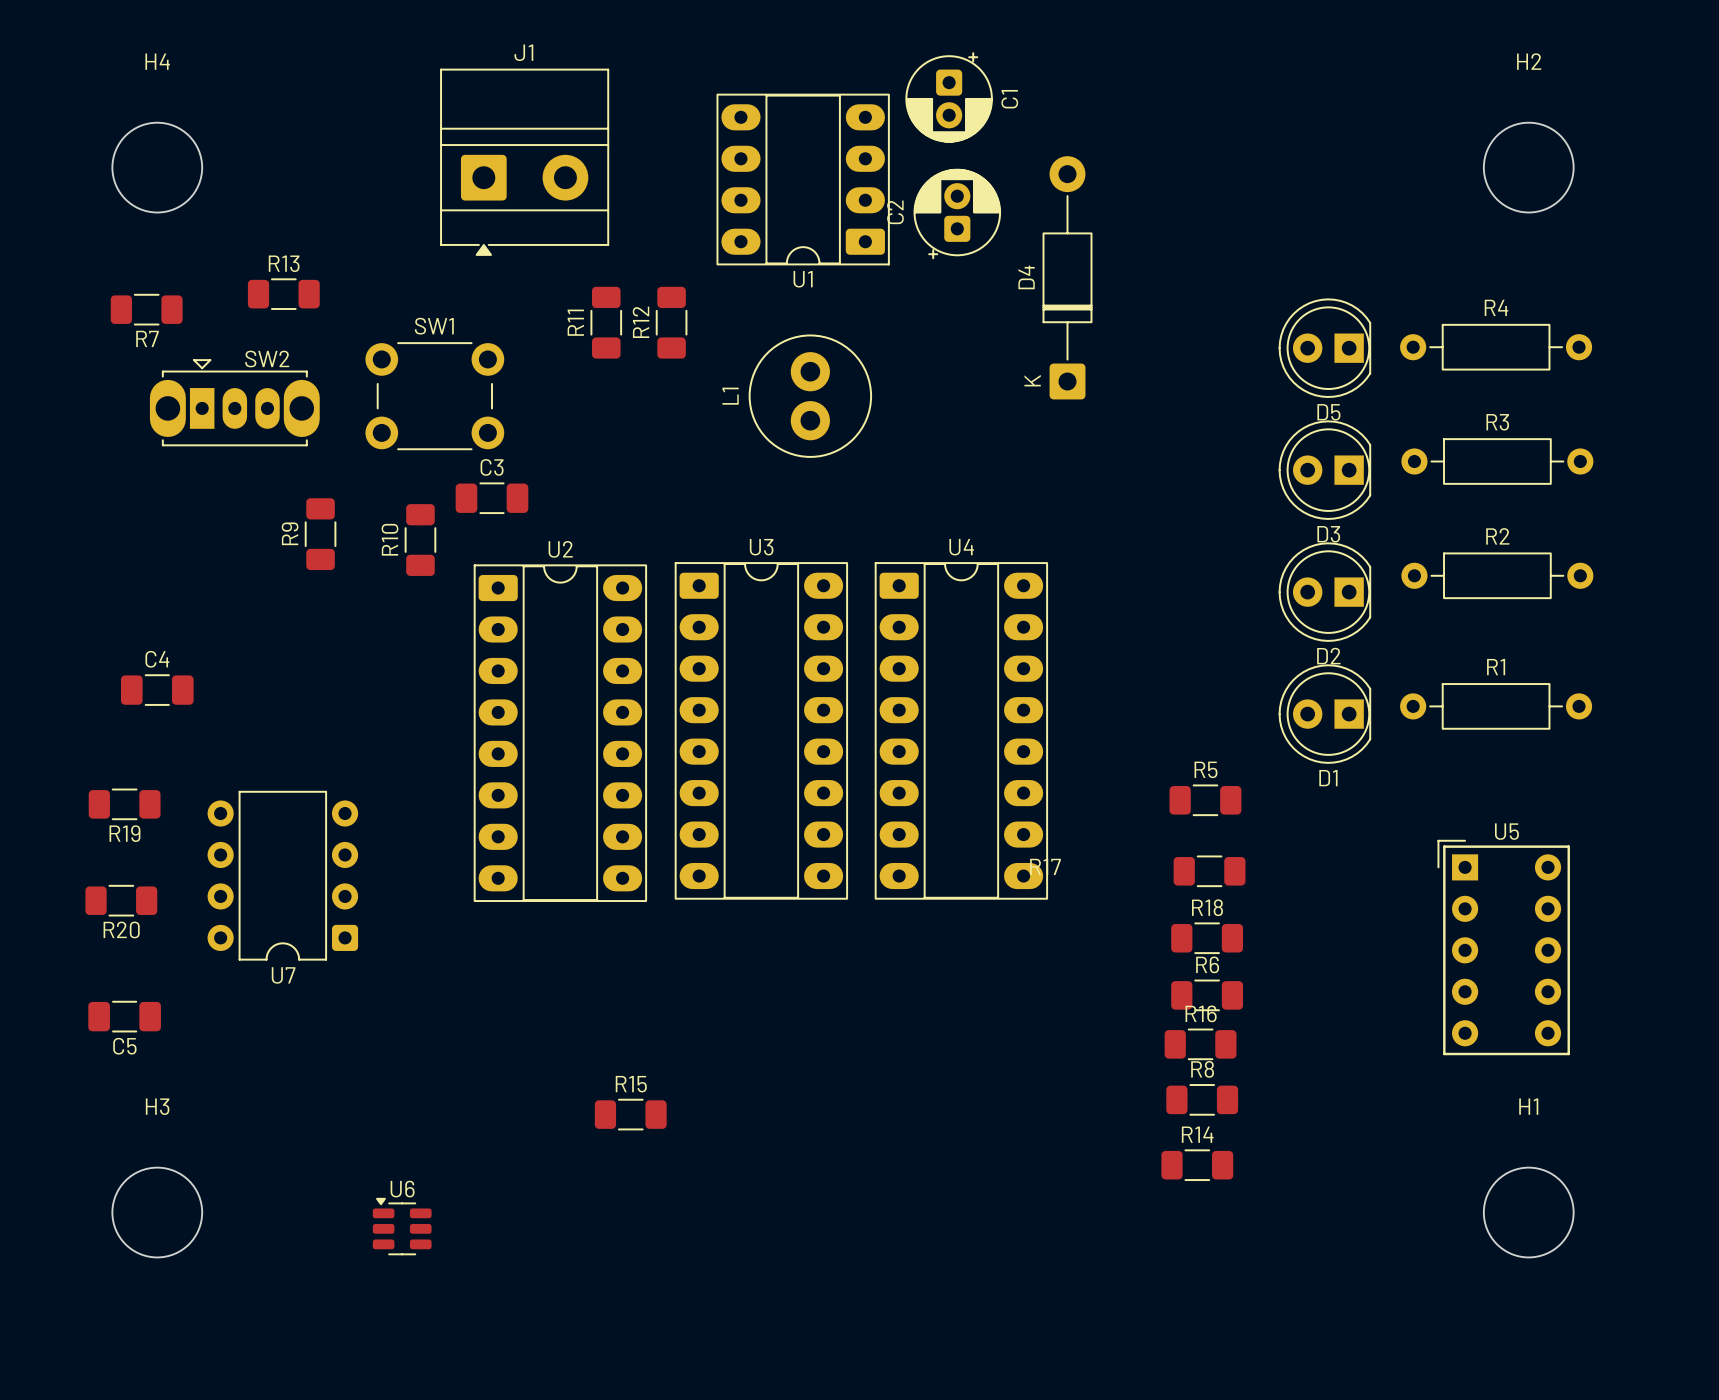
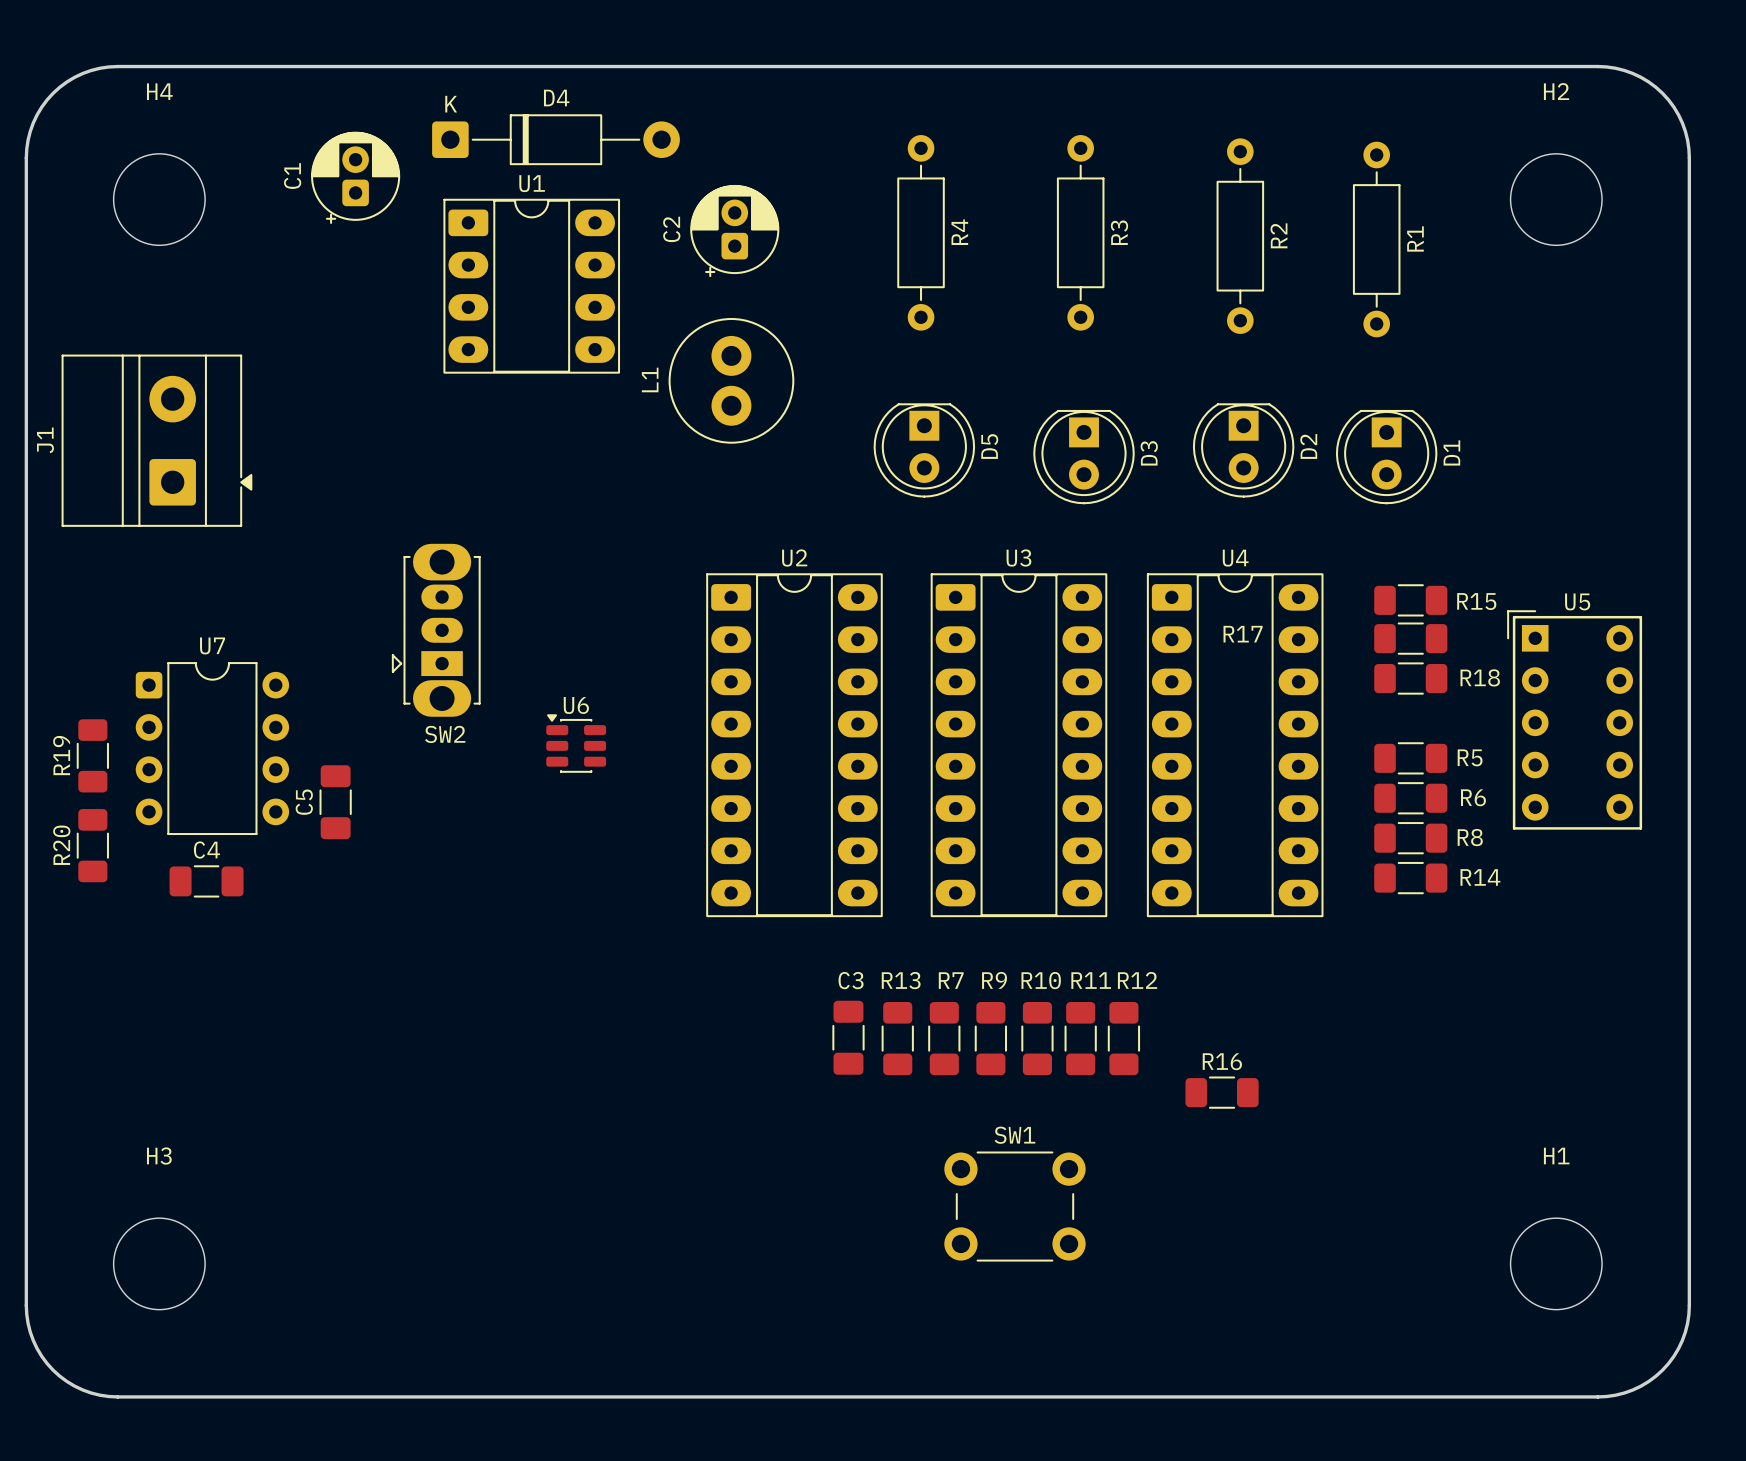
board edge: none -> (117, 66) (1597, 66) (1624, 70) (1640, 77) (1655, 87) (1673, 107) (1682, 123) (1687, 140) (1689, 158) (1689, 1305) (1687, 1323) (1682, 1340) (1668, 1363) (1655, 1376) (1640, 1386) (1615, 1395) (1597, 1396) (117, 1396) (99, 1395) (82, 1389) (59, 1376) (47, 1363) (37, 1348) (30, 1332) (26, 1305) (26, 158) (28, 140) (33, 123) (41, 107) (53, 93) (66, 81) (82, 73) (99, 68) (117, 66)
C1 rotation: 0° (949, 97) -> 180° (355, 177)
C1 position: (949, 97) -> (355, 177)
J1 rotation: 0° (524, 162) -> 90° counterclockwise (156, 440)
J1 position: (524, 162) -> (156, 440)
U1 rotation: 0° (803, 179) -> 180° (531, 286)
U1 position: (803, 179) -> (531, 286)
C2 position: (957, 214) -> (734, 231)
D4 rotation: 0° (1067, 277) -> 90° clockwise (555, 139)
D4 position: (1067, 277) -> (555, 139)
R13 rotation: 0° (283, 294) -> 90° clockwise (897, 1038)
R13 position: (283, 294) -> (897, 1038)
R7 rotation: 0° (146, 309) -> 90° clockwise (944, 1038)
R7 position: (146, 309) -> (944, 1038)
R11 name rotation: 0° (575, 322) -> 90° clockwise (1091, 980)
R11 name position: R11 (575, 322) -> R11 (1091, 980)
R11 position: (606, 322) -> (1080, 1038)
R12 name rotation: 0° (641, 322) -> 90° clockwise (1137, 980)
R12 name position: R12 (641, 322) -> R12 (1137, 980)
R12 position: (671, 322) -> (1123, 1038)
R7 name position: R7 (147, 338) -> R7 (951, 980)
R4 rotation: 0° (1496, 347) -> 90° clockwise (921, 232)
R4 position: (1496, 347) -> (921, 232)
D5 rotation: 0° (1324, 348) -> 90° counterclockwise (924, 450)
D5 position: (1324, 348) -> (924, 450)
SW2 name position: SW2 (267, 359) -> SW2 (445, 734)
SW1 position: (434, 396) -> (1014, 1206)
L1 position: (810, 396) -> (731, 380)
SW2 rotation: 0° (234, 402) -> 90° counterclockwise (436, 630)
SW2 position: (234, 402) -> (436, 630)
R3 rotation: 0° (1497, 461) -> 90° clockwise (1080, 232)
R3 position: (1497, 461) -> (1080, 232)
D3 rotation: 0° (1324, 470) -> 90° counterclockwise (1084, 457)
D3 position: (1324, 470) -> (1084, 457)
C3 rotation: 0° (491, 498) -> 90° clockwise (848, 1037)
C3 position: (491, 498) -> (848, 1037)
R9 name rotation: 0° (290, 533) -> 90° clockwise (994, 980)
R9 name position: R9 (290, 533) -> R9 (994, 980)
R9 position: (320, 534) -> (990, 1038)
R10 name rotation: 0° (389, 539) -> 90° clockwise (1041, 980)
R10 name position: R10 (389, 539) -> R10 (1041, 980)
R10 position: (420, 540) -> (1037, 1038)
R2 rotation: 0° (1497, 575) -> 90° clockwise (1240, 236)
R2 position: (1497, 575) -> (1240, 236)
D2 rotation: 0° (1324, 592) -> 90° counterclockwise (1243, 450)
D2 position: (1324, 592) -> (1243, 450)
C4 position: (157, 690) -> (206, 881)
R1 rotation: 0° (1496, 706) -> 90° clockwise (1376, 239)
R1 position: (1496, 706) -> (1376, 239)
D1 rotation: 0° (1324, 714) -> 90° counterclockwise (1386, 457)
D1 position: (1324, 714) -> (1386, 457)
U3 position: (761, 730) -> (1018, 745)
U4 position: (961, 730) -> (1235, 745)
U2 position: (560, 733) -> (794, 745)
R5 name position: R5 (1205, 769) -> R5 (1470, 757)
R5 position: (1205, 800) -> (1410, 758)
R19 rotation: 0° (124, 804) -> 90° clockwise (92, 755)
R19 position: (124, 804) -> (92, 755)
R17 position: (1209, 871) -> (1410, 638)
U7 rotation: 0° (282, 875) -> 180° (212, 748)
U7 position: (282, 875) -> (212, 748)
R20 rotation: 0° (121, 900) -> 90° clockwise (92, 845)
R20 position: (121, 900) -> (92, 845)
R18 name position: R18 (1207, 907) -> R18 (1480, 677)
R18 position: (1207, 938) -> (1410, 678)
U5 position: (1503, 947) -> (1574, 719)
R6 name position: R6 (1207, 964) -> R6 (1473, 797)
R6 position: (1207, 995) -> (1410, 798)
C5 rotation: 0° (124, 1016) -> 90° clockwise (335, 802)
C5 position: (124, 1016) -> (335, 802)
R8 name position: R8 (1202, 1069) -> R8 (1470, 837)
R15 name position: R15 (631, 1084) -> R15 (1476, 601)
R8 position: (1202, 1099) -> (1410, 838)
R15 position: (630, 1114) -> (1410, 600)
R14 name position: R14 (1197, 1134) -> R14 (1480, 877)
R14 position: (1197, 1165) -> (1410, 878)
U6 footprint: [372, 1197, 432, 1256] -> [546, 714, 607, 773]

